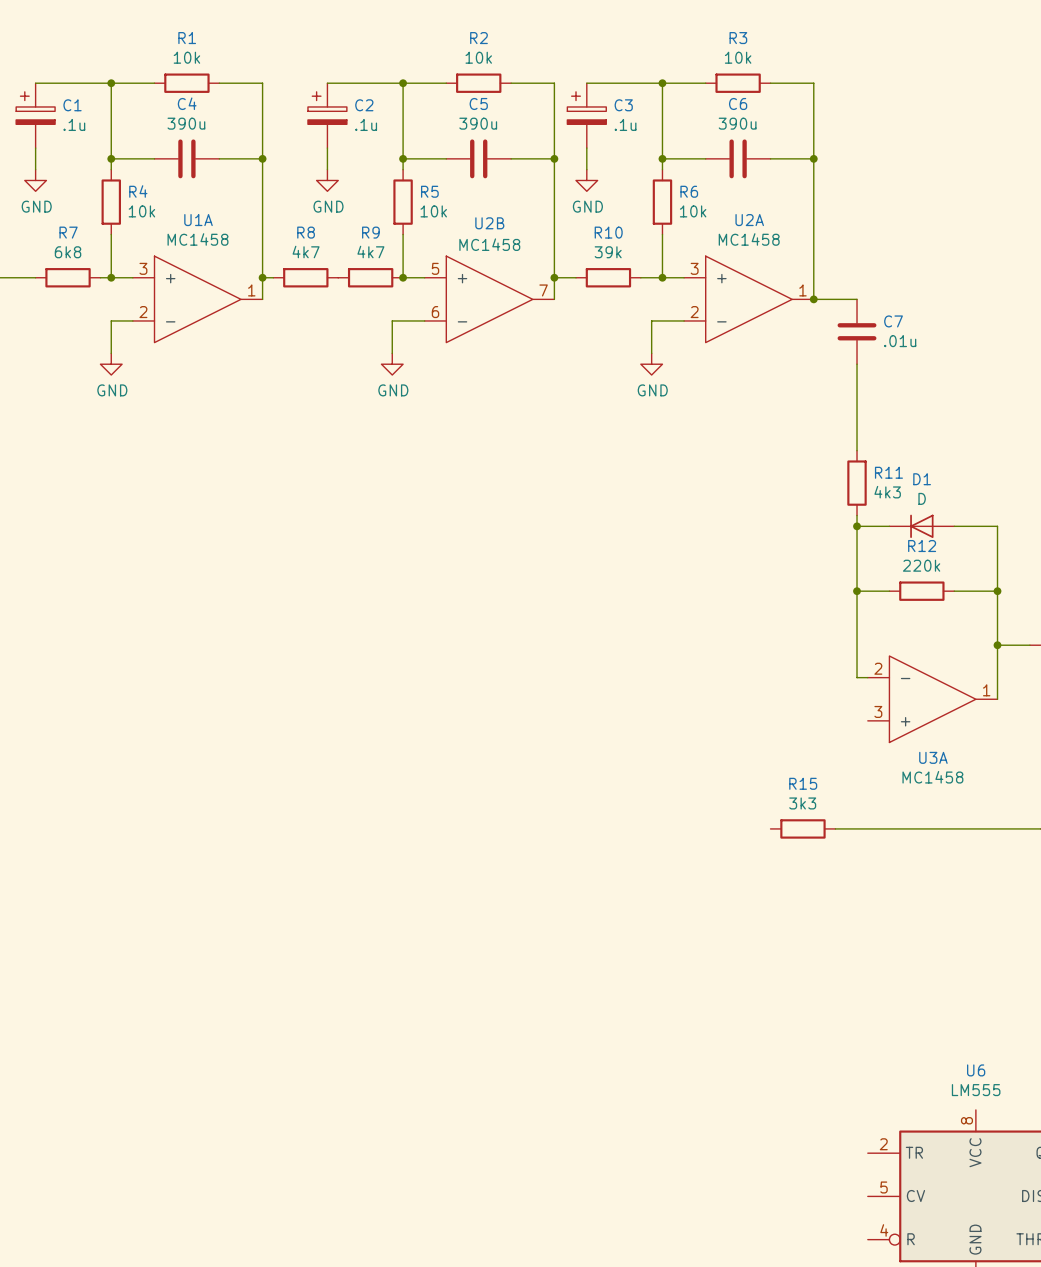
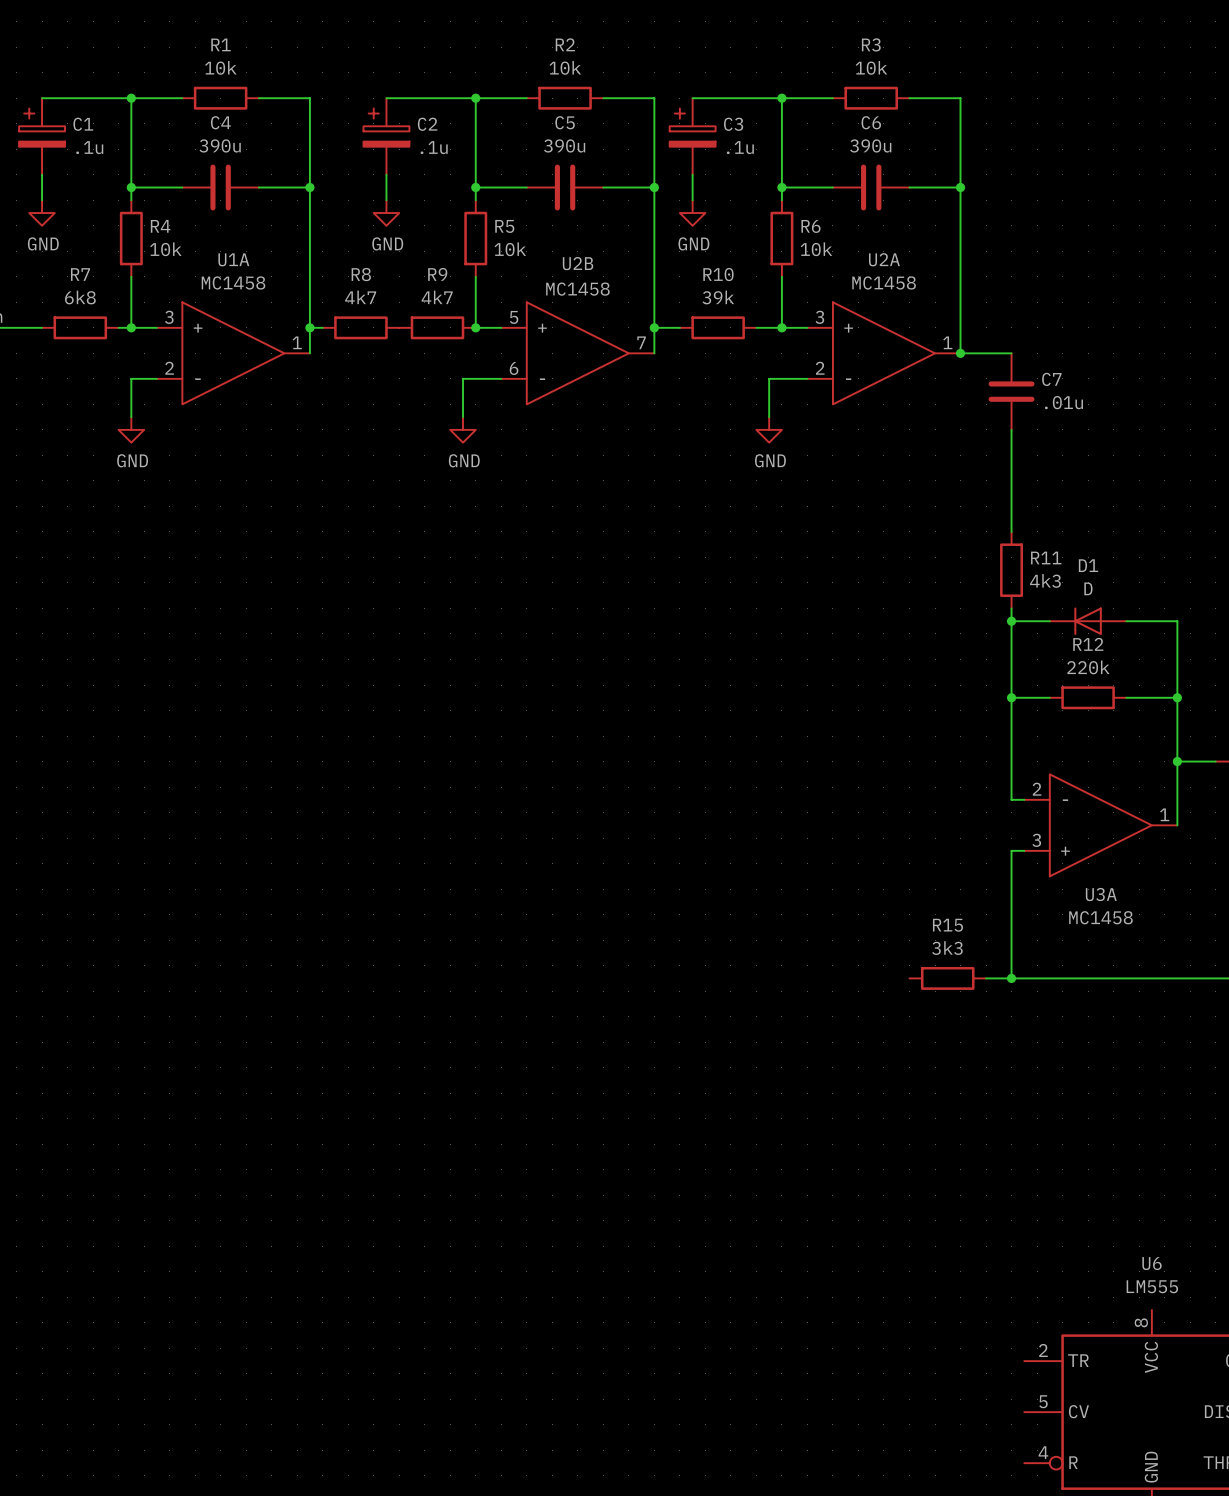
wire: none -> (1024, 850) (1011, 850) (1011, 978)
junction: none -> (1011, 978)

